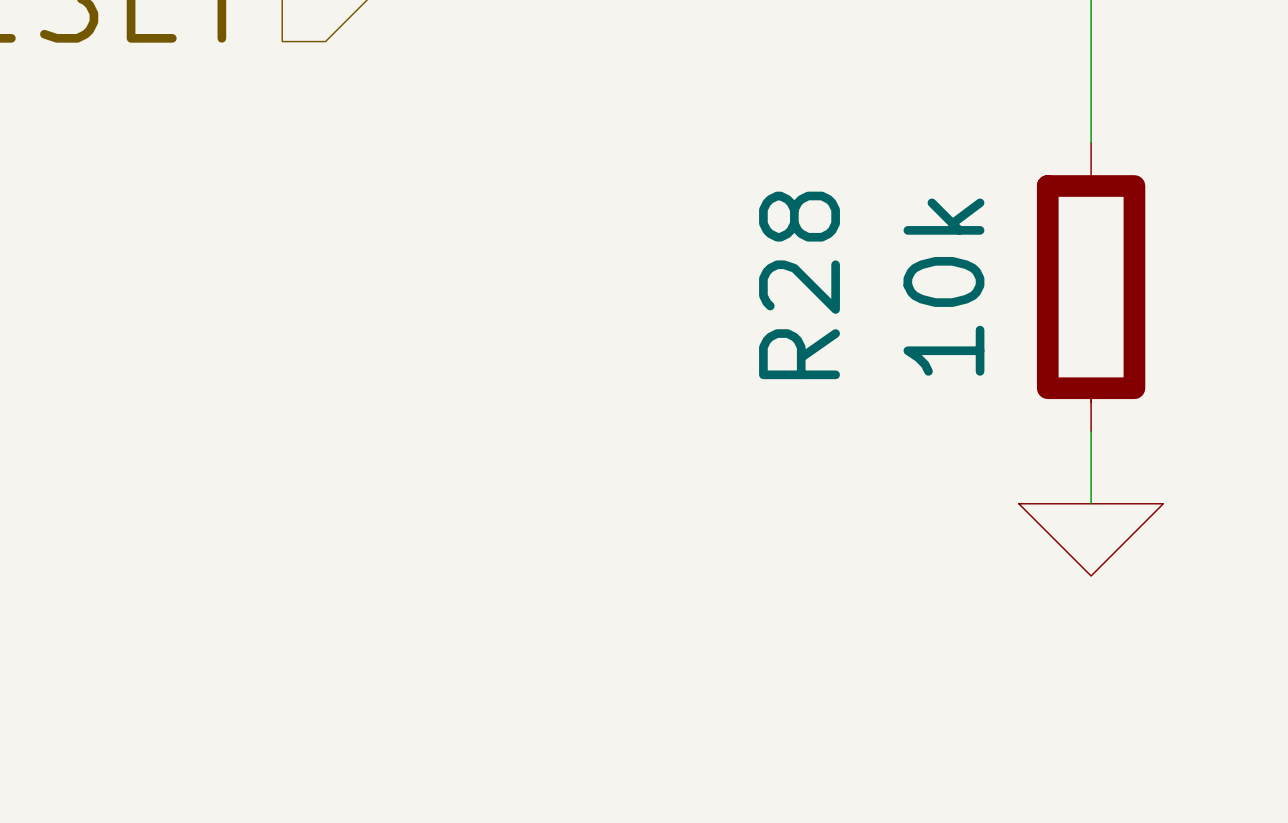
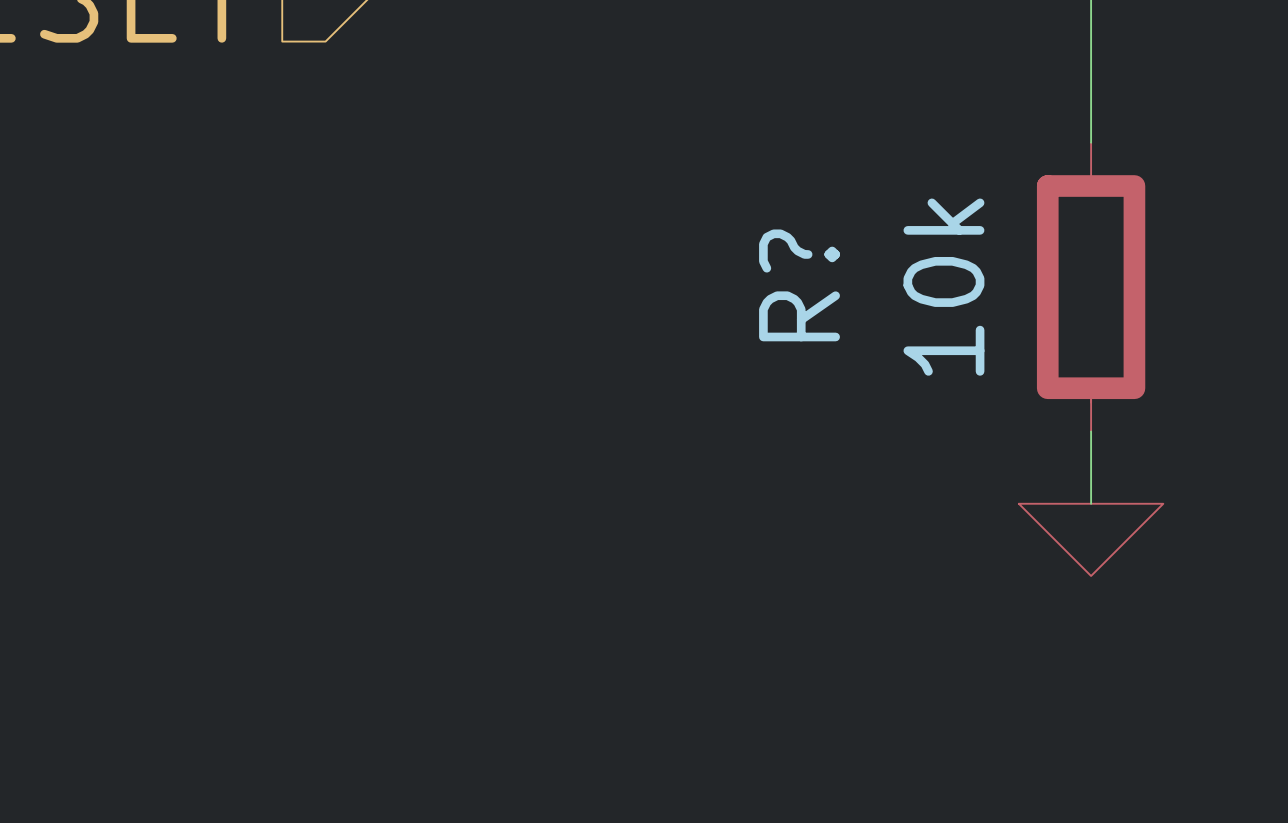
R28 name: R28 (799, 285) -> R? (799, 285)

